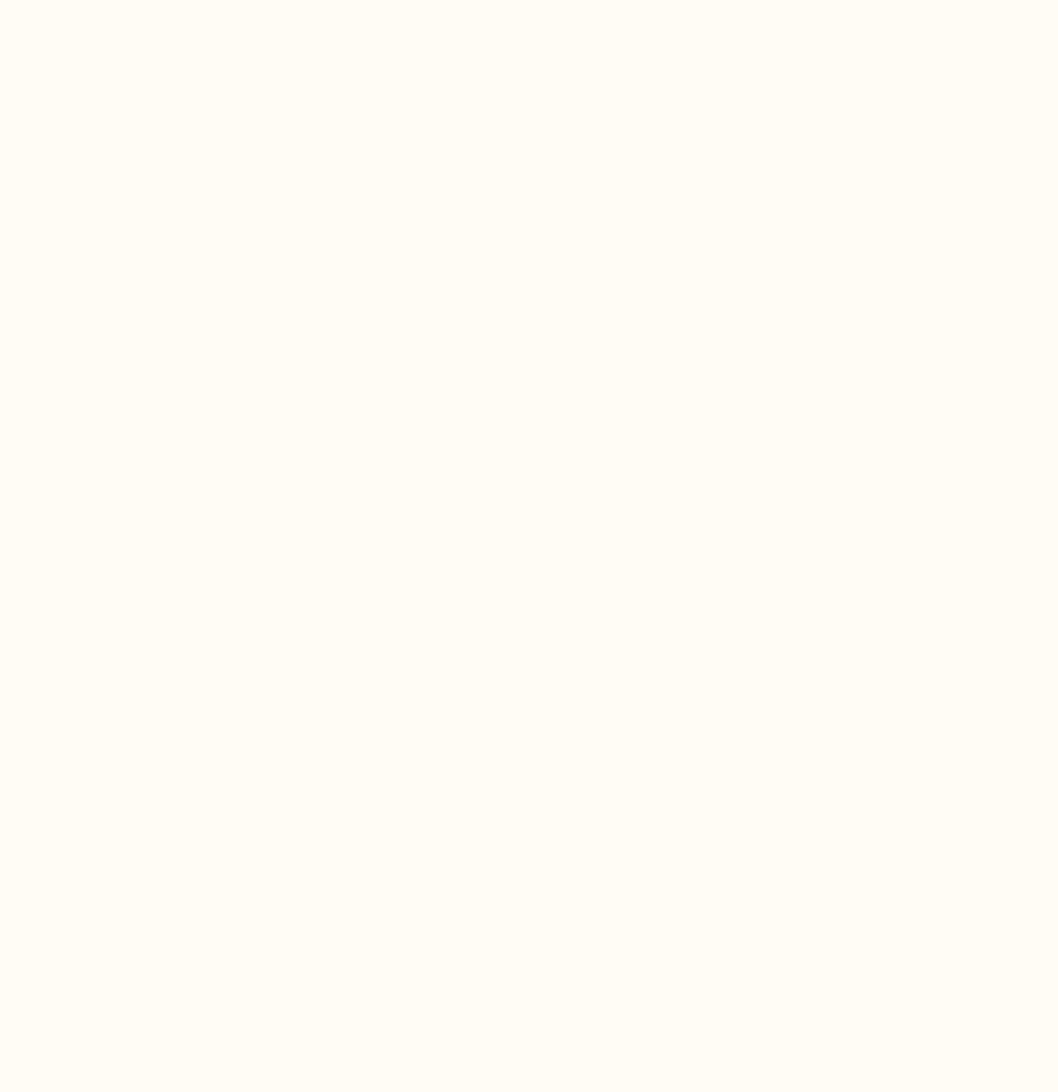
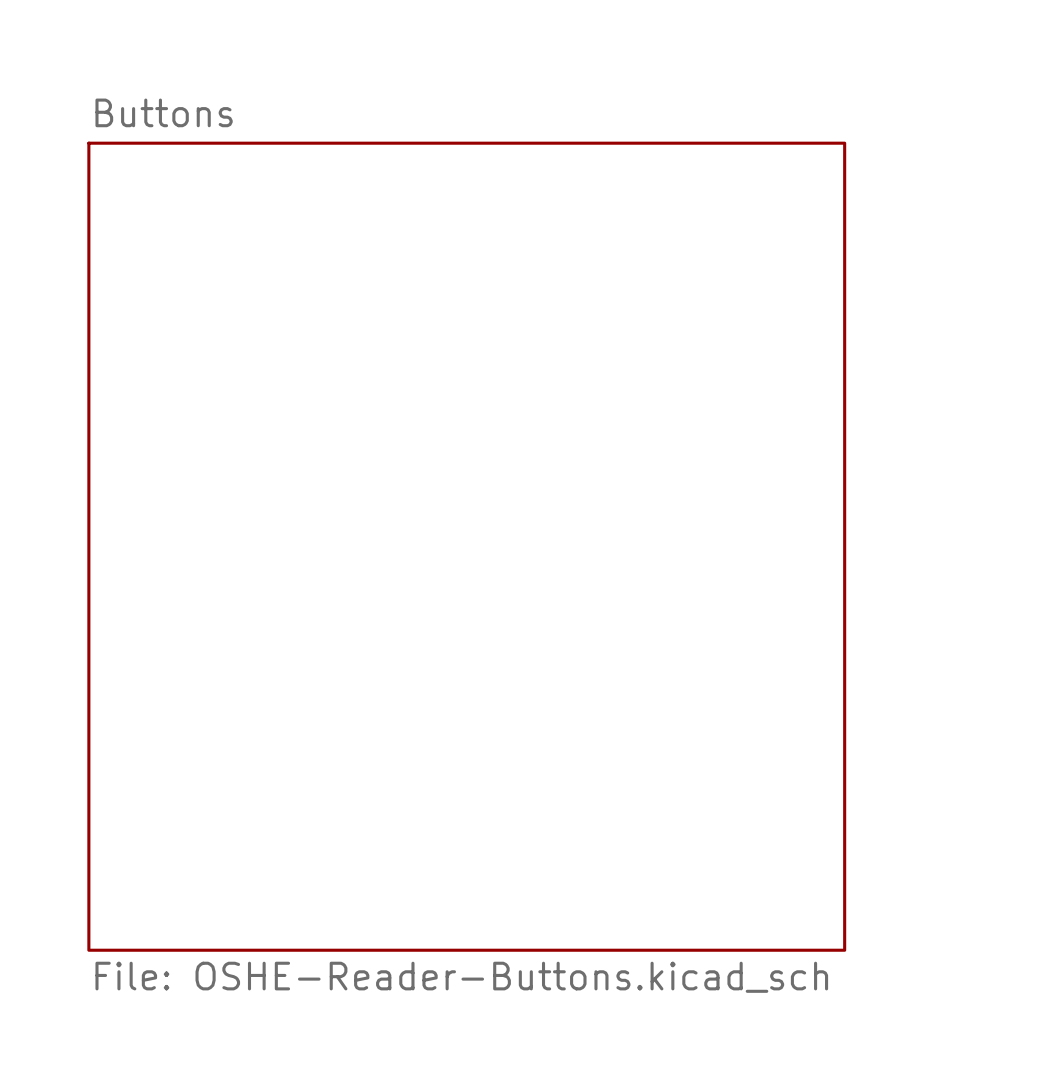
sheet Buttons: none -> File: OSHE-Reader-Buttons.kicad_sch (466, 546)

